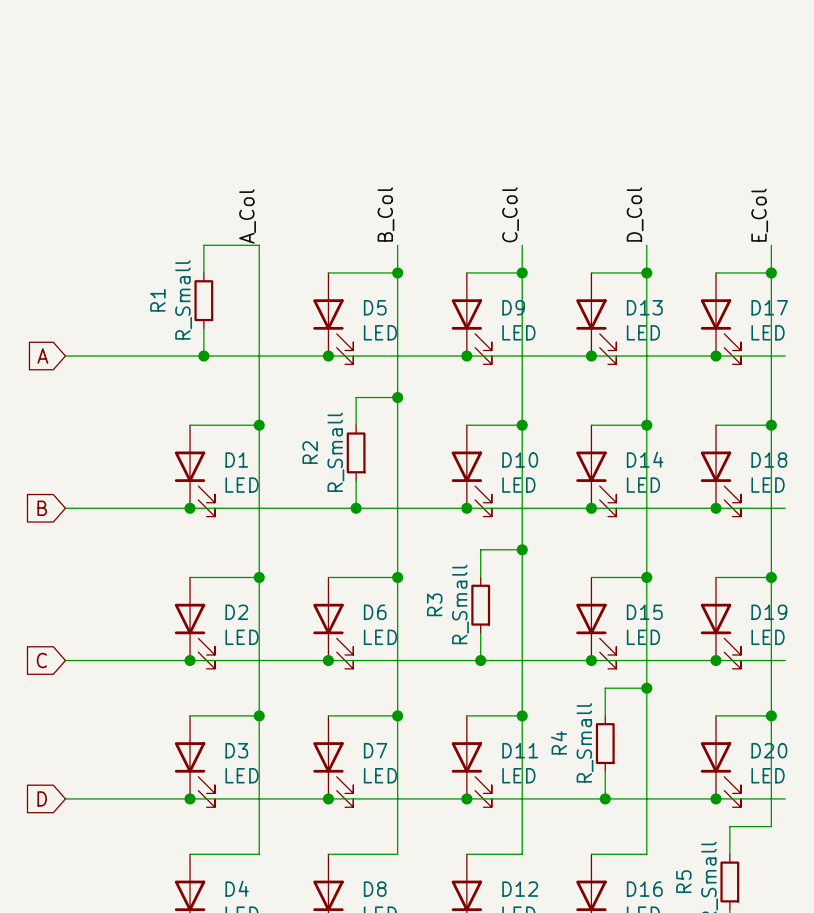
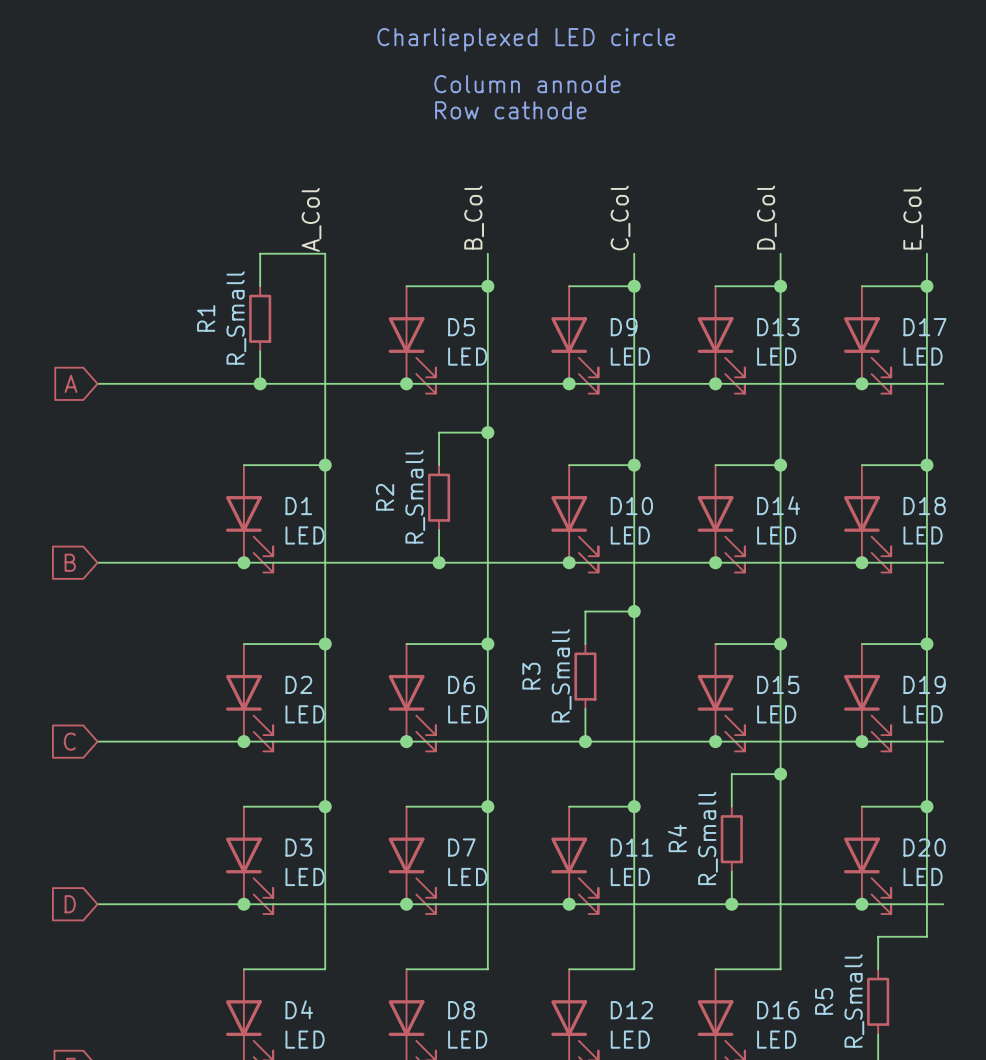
text: none -> Charlieplexed LED circle (526, 39)
text: none -> Column annode (527, 84)
text: none -> Row cathode (510, 110)

